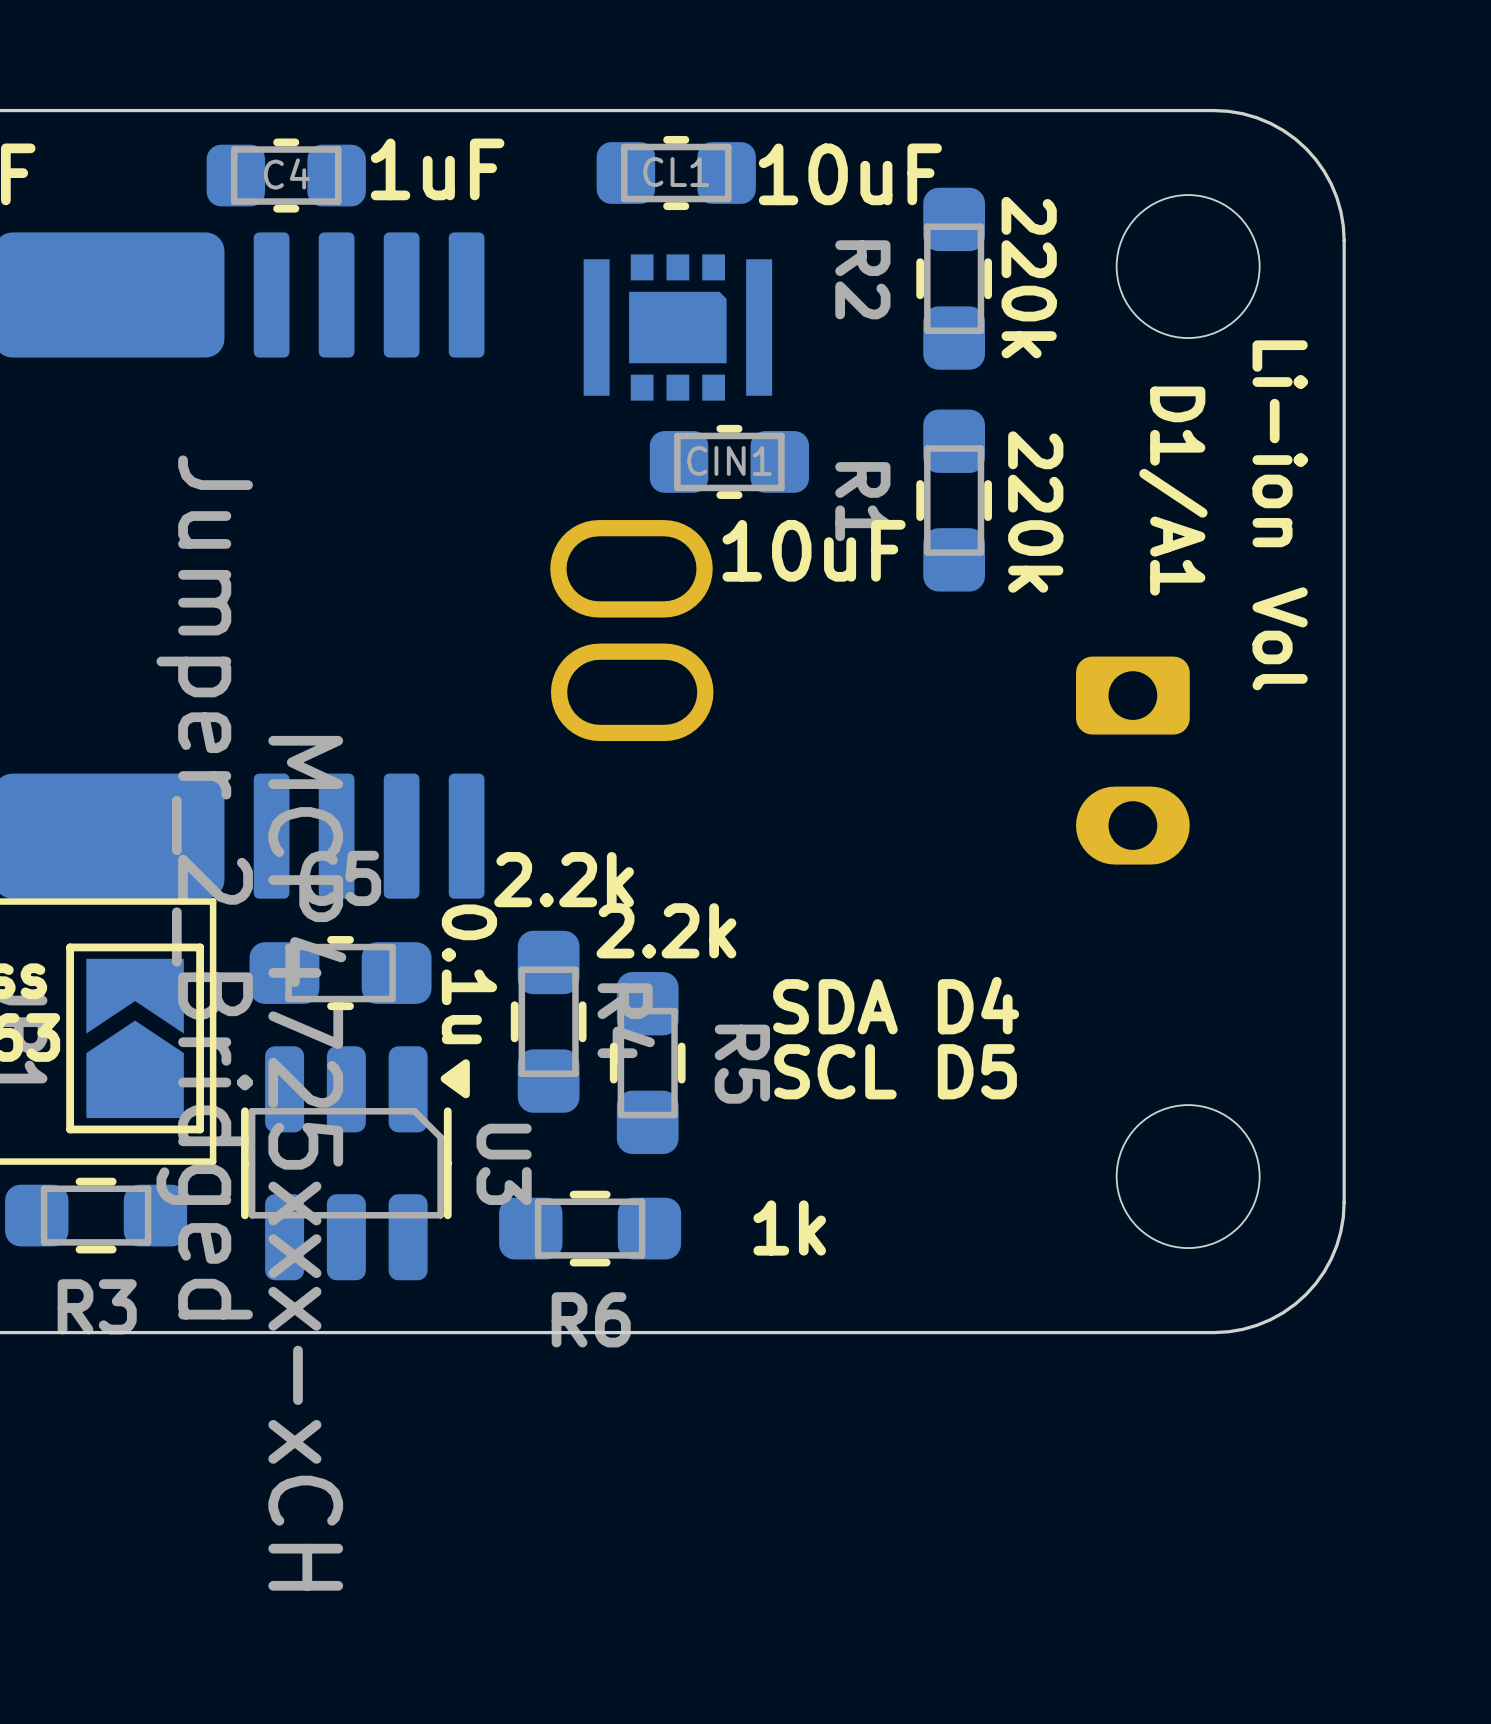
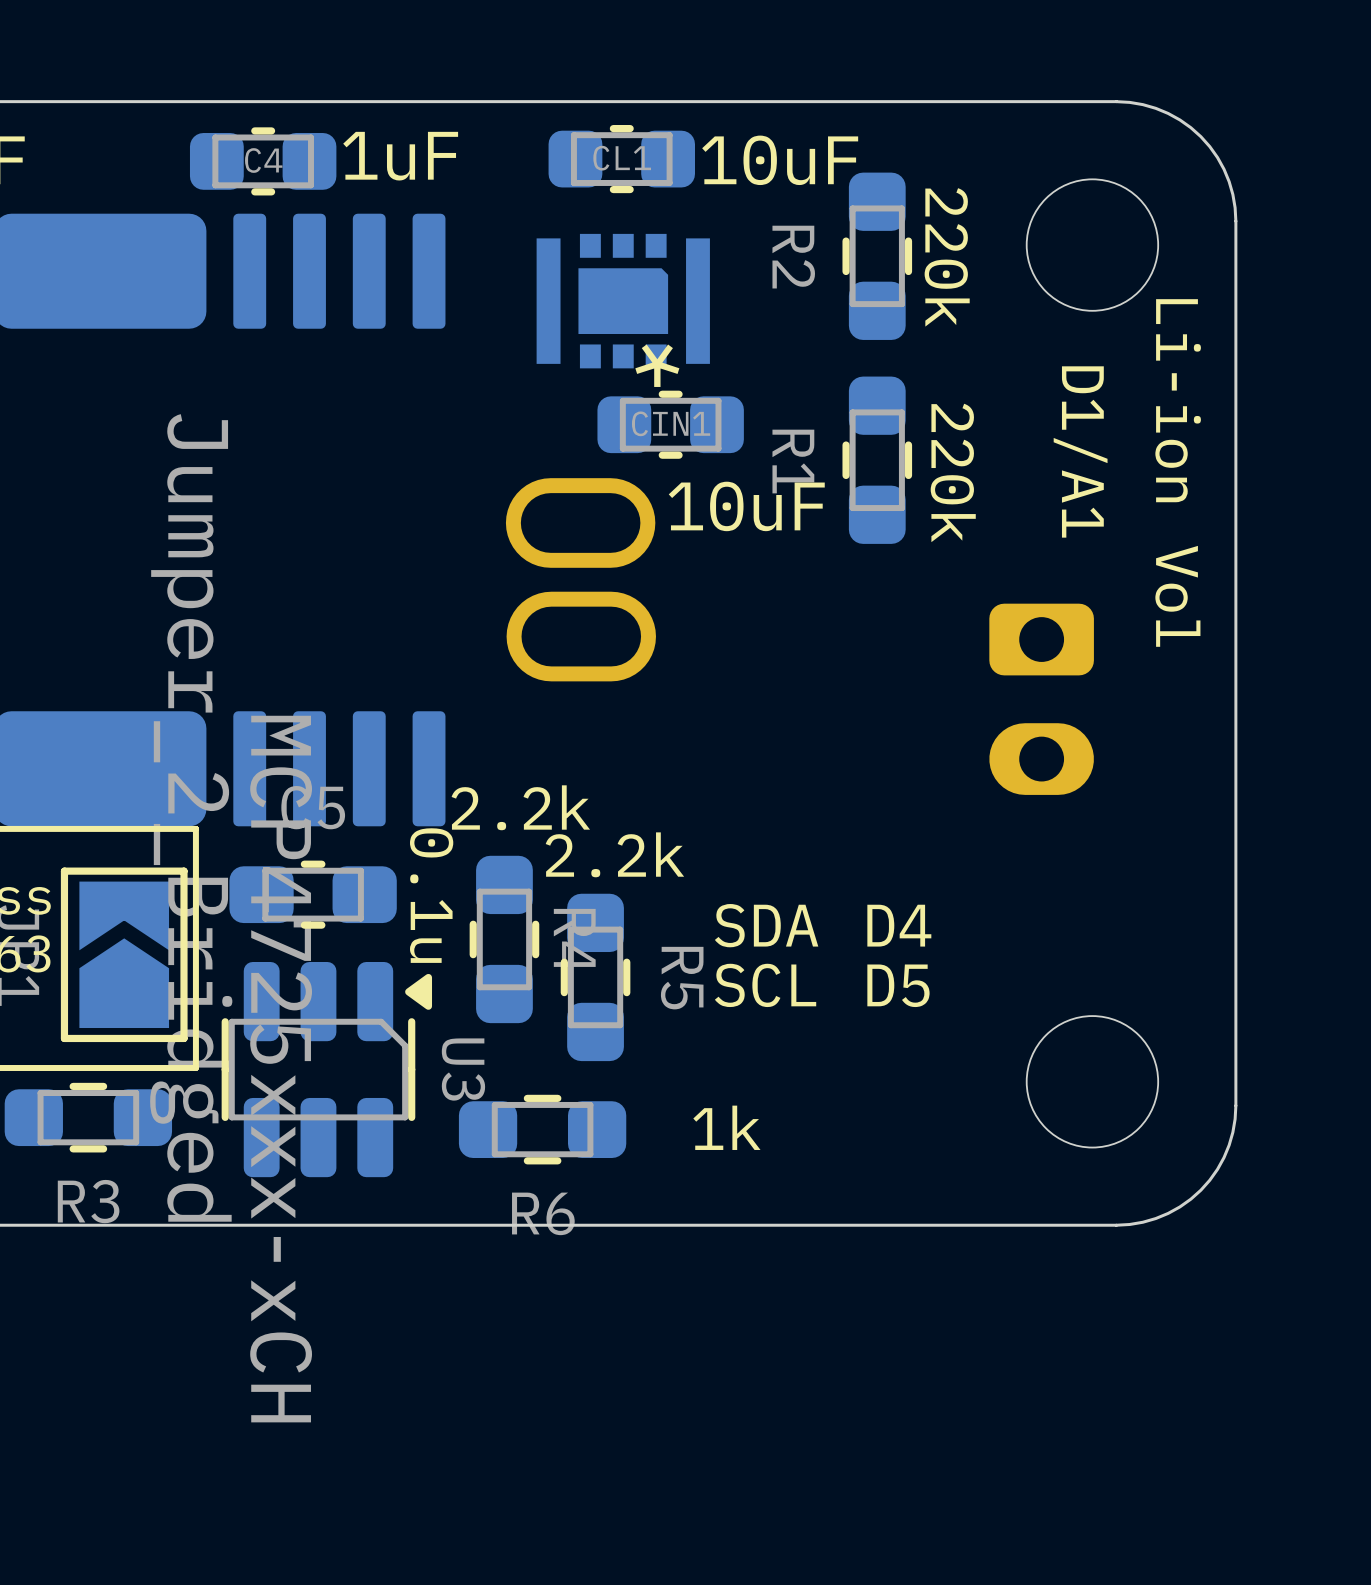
part text: none -> * (657, 365)

